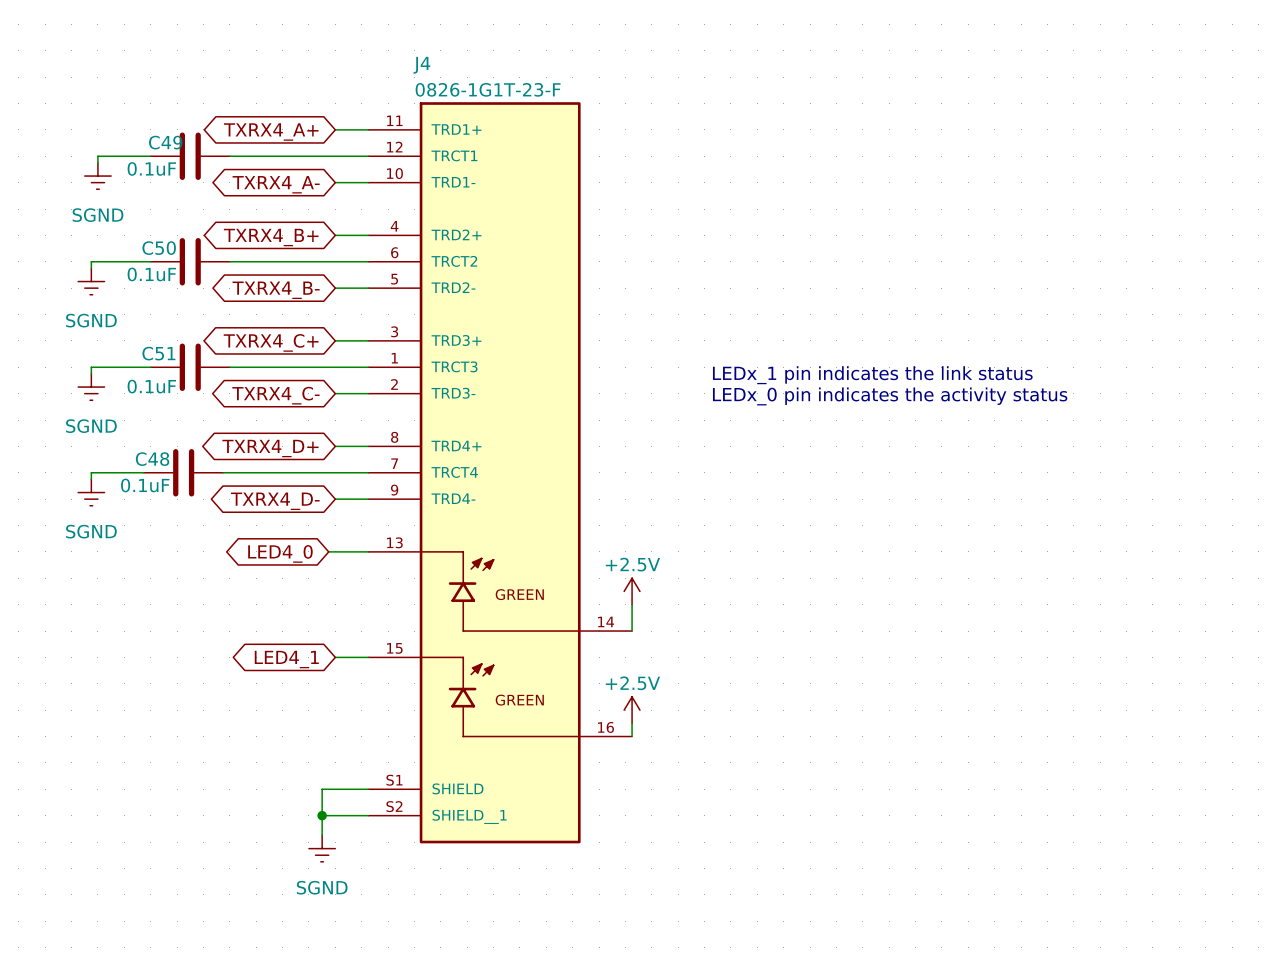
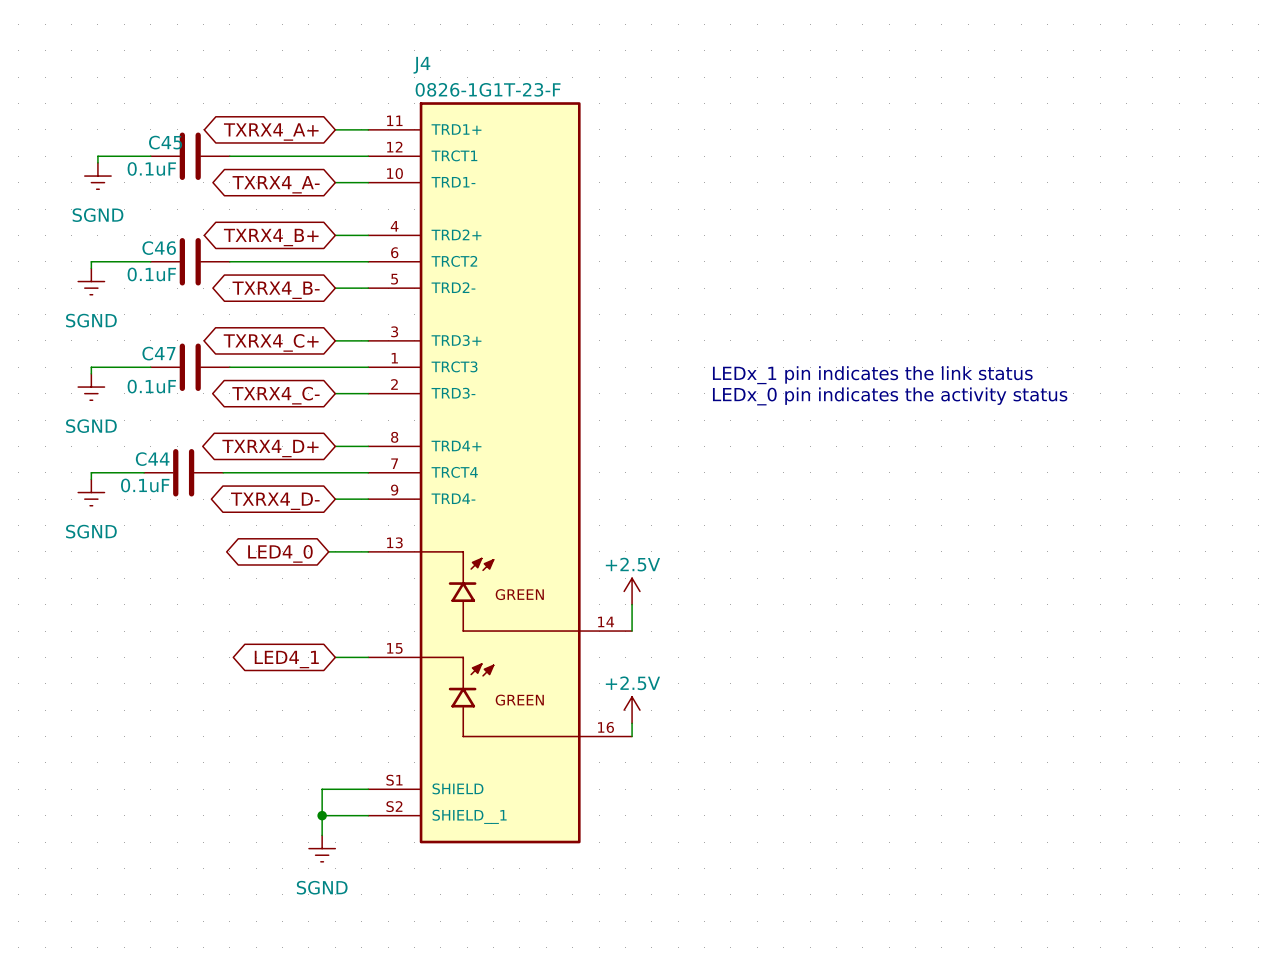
C49 name: C49 (165, 142) -> C45 (165, 142)
C50 name: C50 (159, 248) -> C46 (159, 248)
C51 name: C51 (158, 353) -> C47 (158, 353)
C48 name: C48 (152, 459) -> C44 (152, 459)

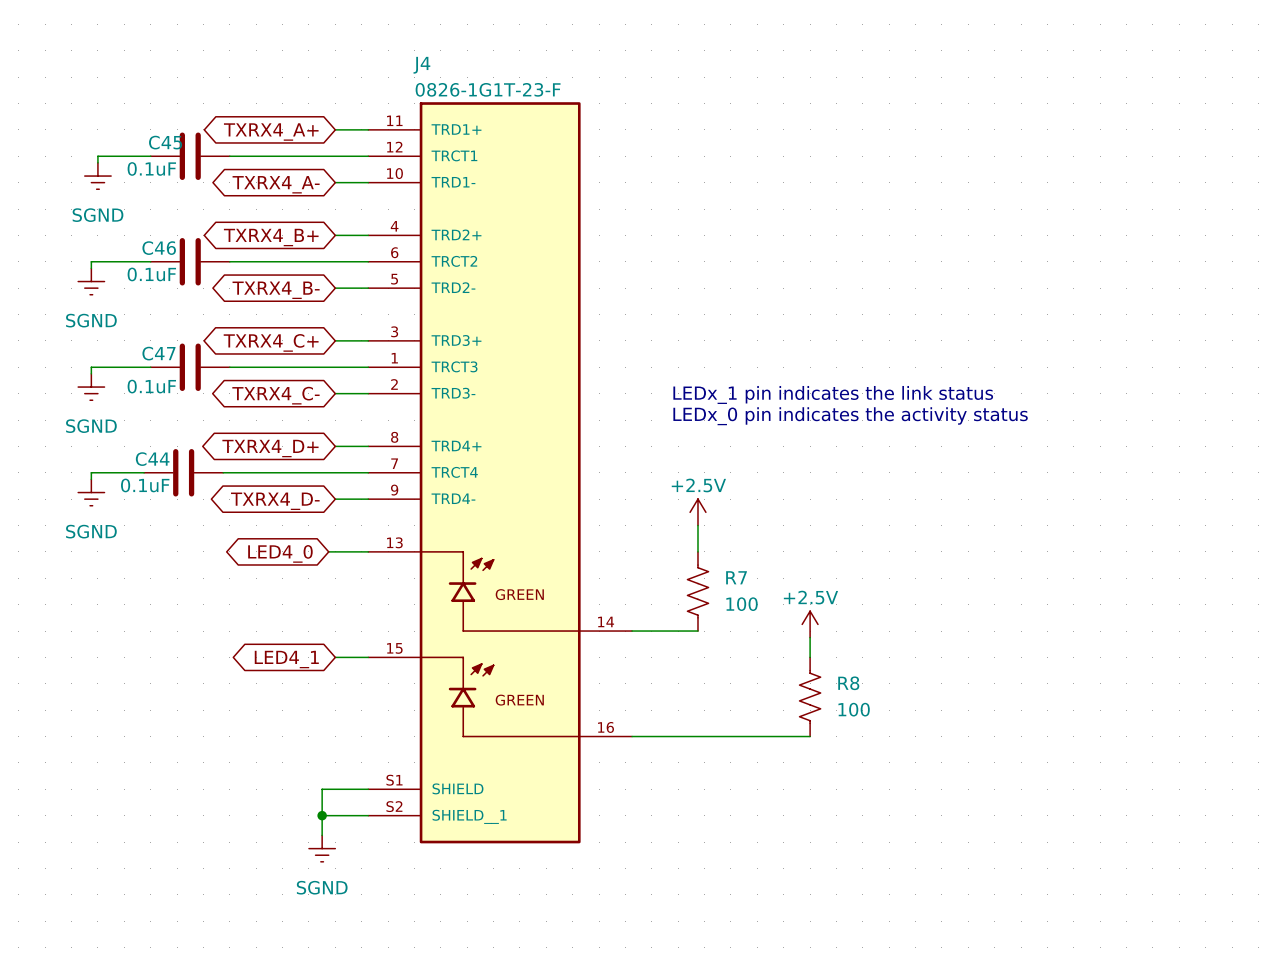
text position: LEDx_1 pin indicates the link status (872, 375) -> LEDx_1 pin indicates the link status (833, 394)
text position: LEDx_0 pin indicates the activity status (890, 396) -> LEDx_0 pin indicates the activity status (850, 416)
power symbol: none -> +2.5V (697, 512)
wire: none -> (697, 525) (697, 551)
power symbol: +2.5V (632, 591) -> none
R7: none -> 100 (697, 591)
wire: (632, 604) (632, 631) -> (697, 631) (632, 631)
power symbol: none -> +2.5V (810, 624)
wire: none -> (810, 637) (810, 657)
R8: none -> 100 (810, 696)
power symbol: +2.5V (632, 710) -> none
wire: (632, 723) (632, 736) -> (810, 736) (632, 736)

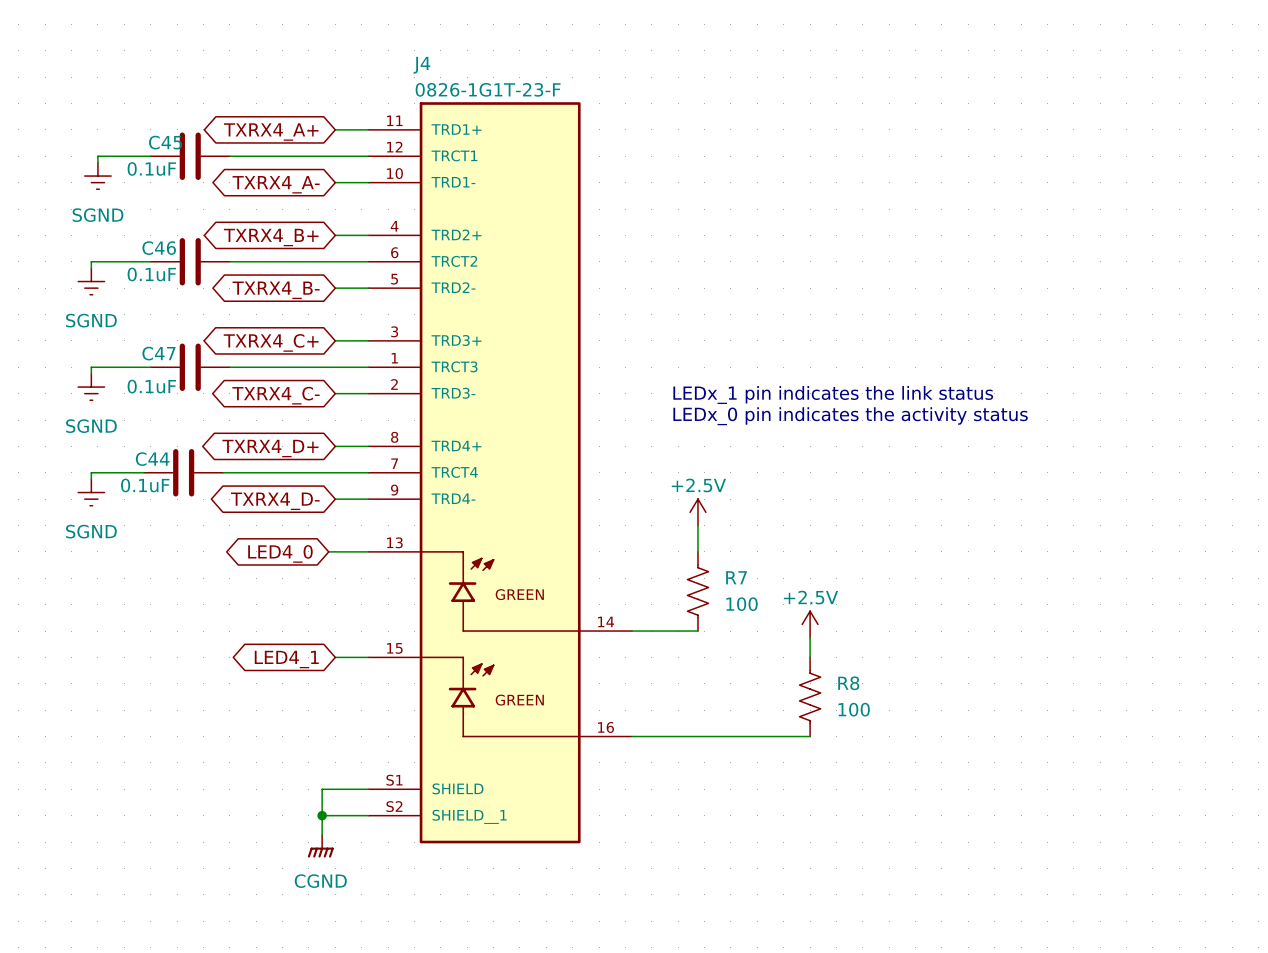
power symbol: SGND (322, 848) -> CGND (320, 846)

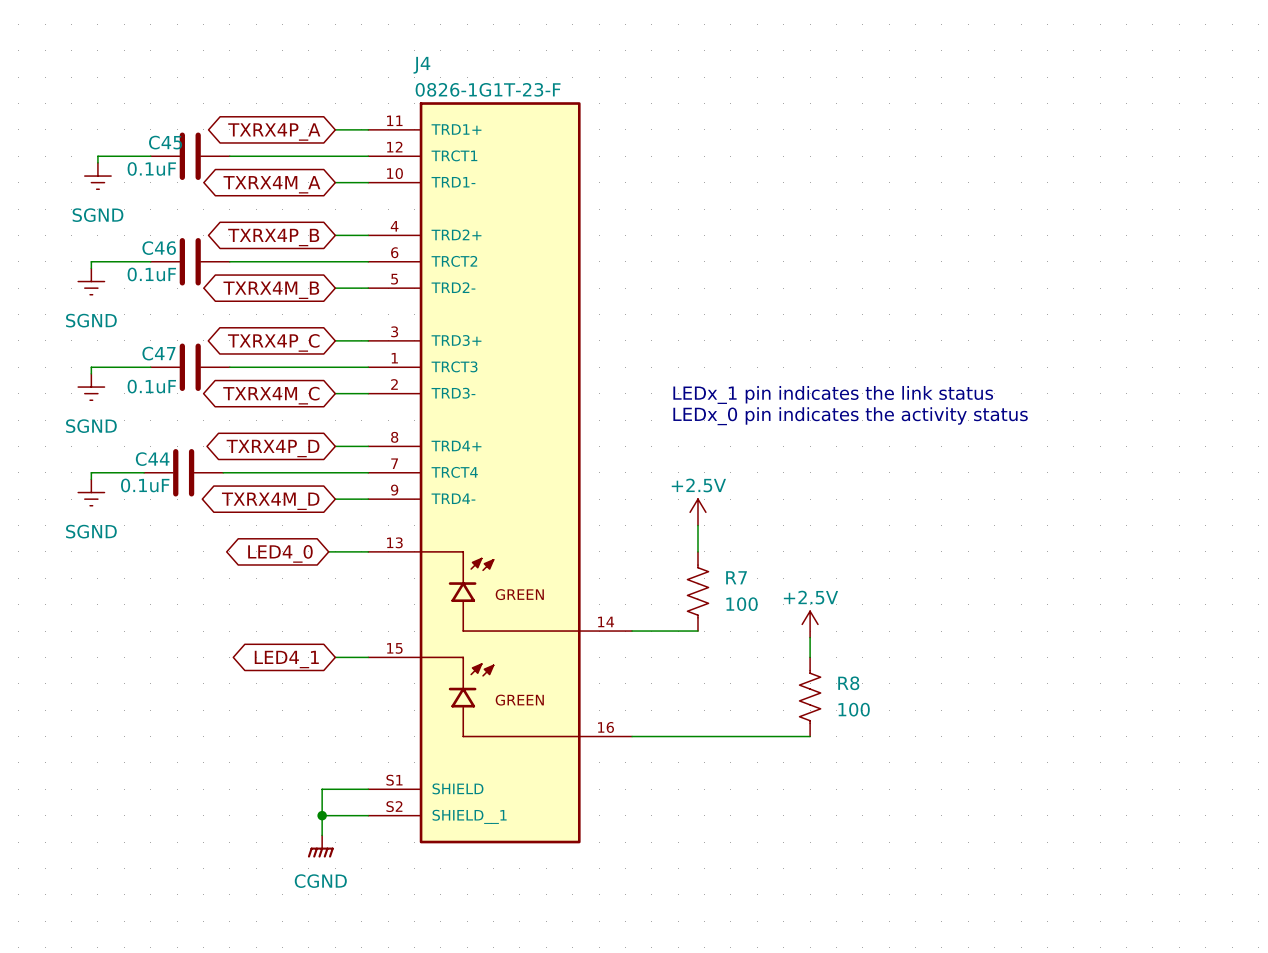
global label: TXRX4_A+ (271, 132) -> TXRX4P_A (274, 132)
global label: TXRX4_A- (276, 184) -> TXRX4M_A (271, 184)
global label: TXRX4_B+ (271, 237) -> TXRX4P_B (273, 237)
global label: TXRX4_B- (276, 290) -> TXRX4M_B (271, 290)
global label: TXRX4_C+ (271, 342) -> TXRX4P_C (273, 342)
global label: TXRX4_C- (275, 395) -> TXRX4M_C (271, 395)
global label: TXRX4_D+ (270, 448) -> TXRX4P_D (273, 448)
global label: TXRX4_D- (275, 501) -> TXRX4M_D (270, 501)

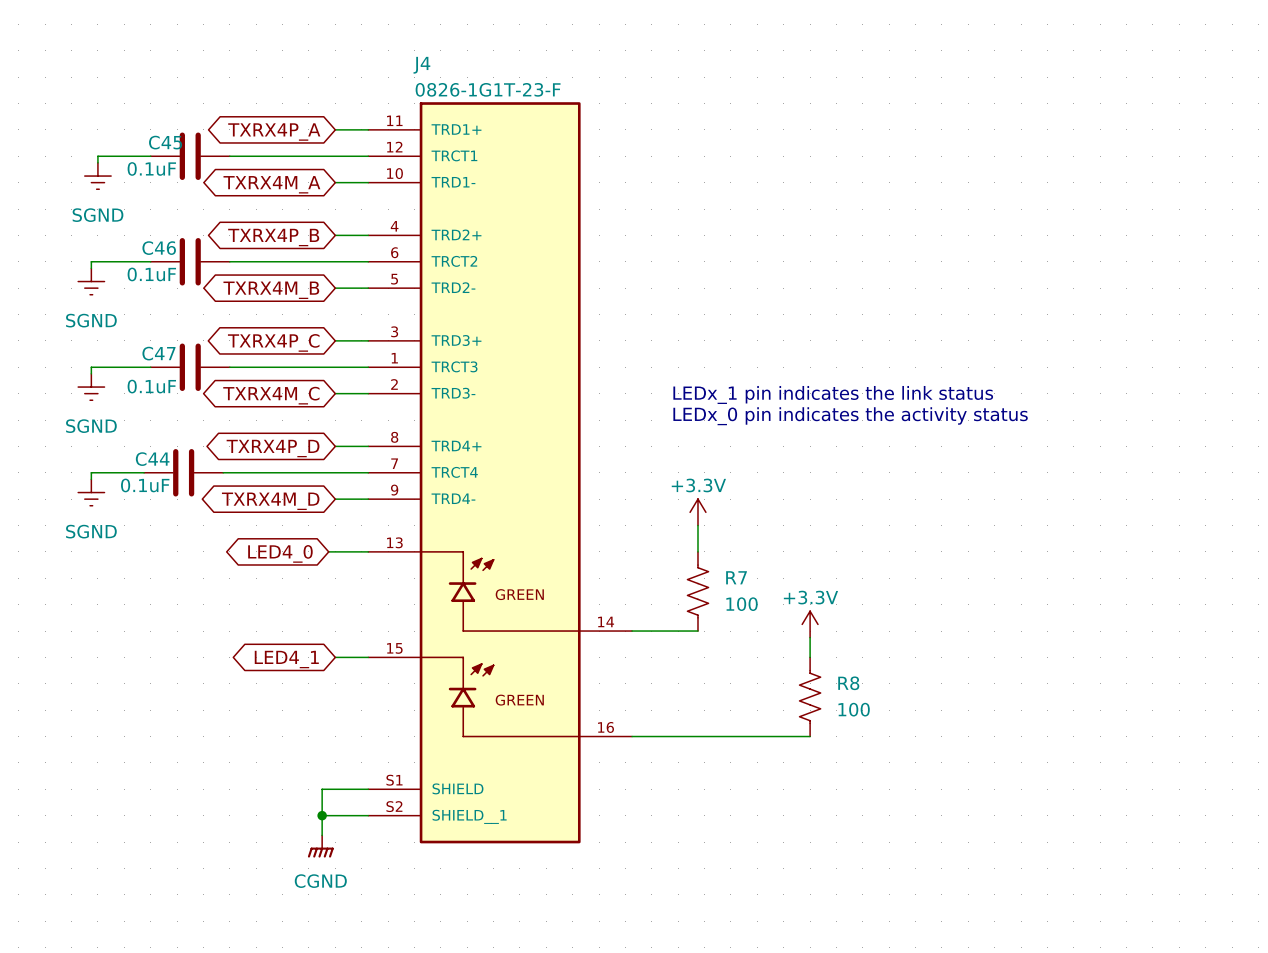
power symbol: +2.5V (697, 512) -> +3.3V (697, 512)
power symbol: +2.5V (810, 624) -> +3.3V (810, 624)

